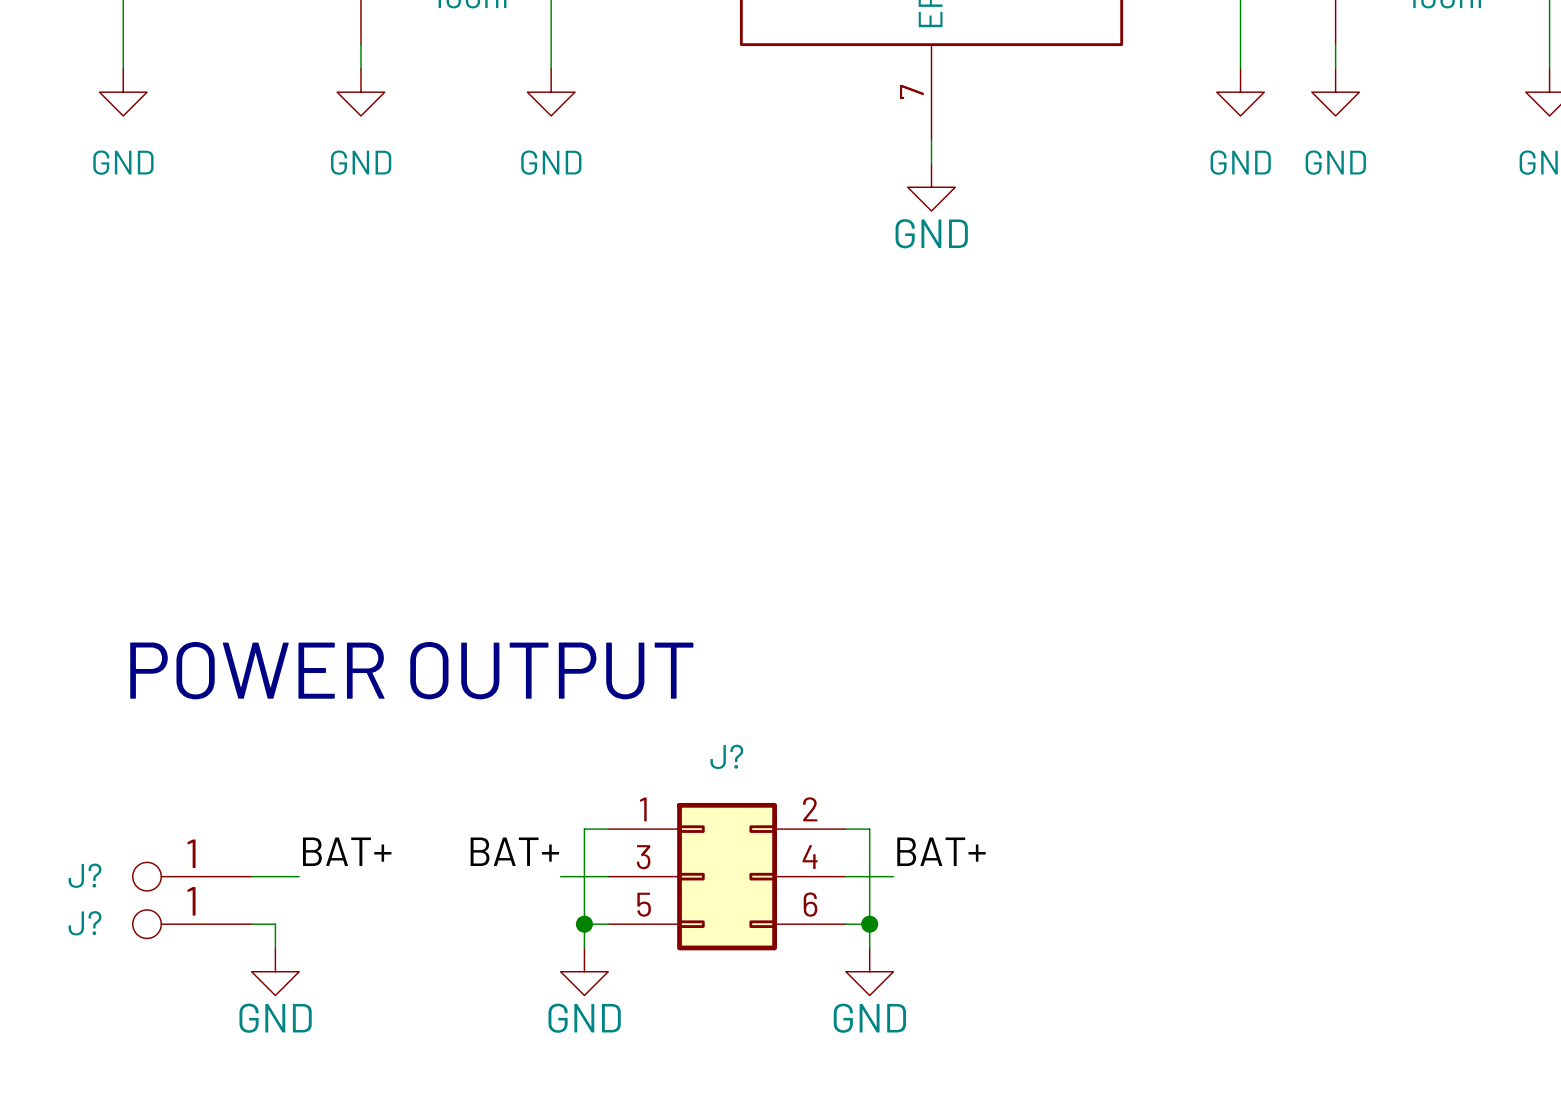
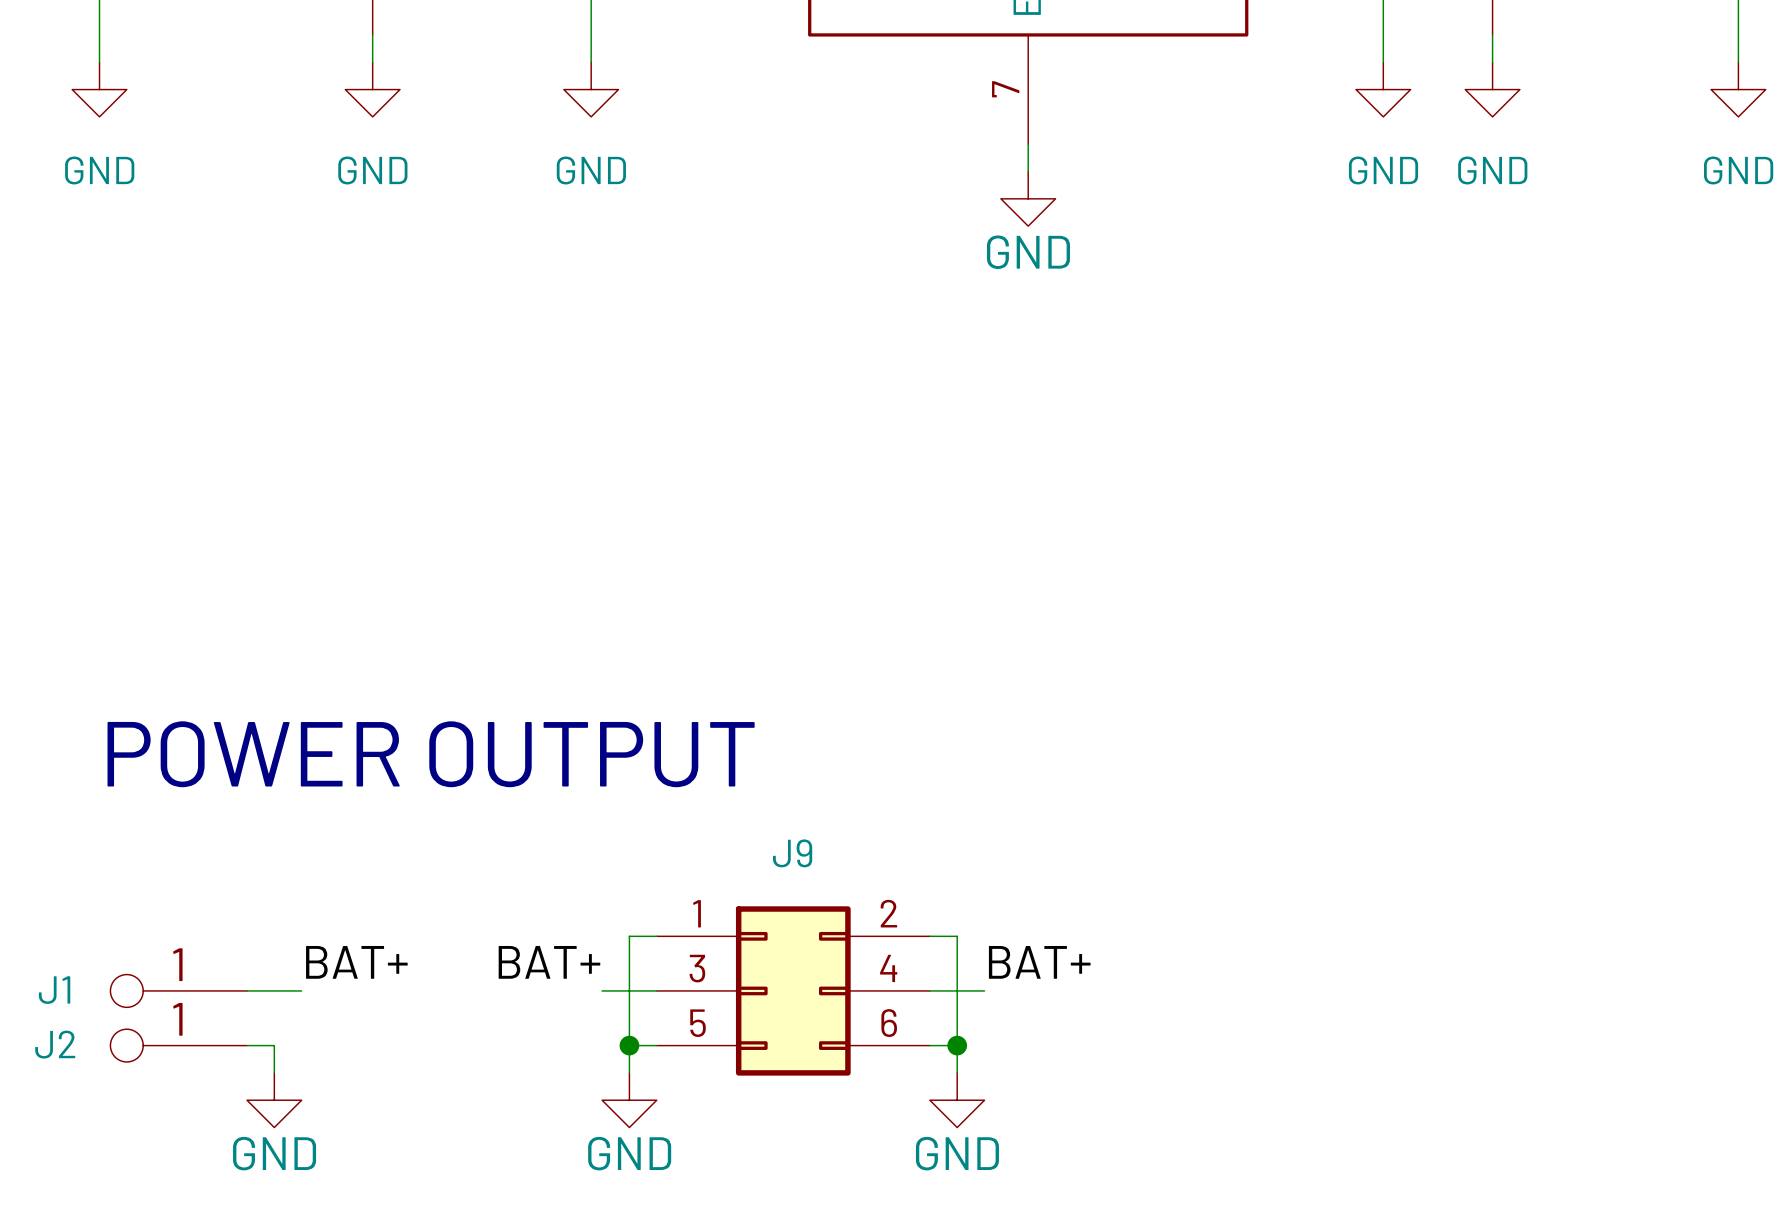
J? name: J? (726, 756) -> J9 (792, 853)
J? name: J? (84, 875) -> J1 (54, 990)
J? name: J? (84, 923) -> J2 (55, 1044)

